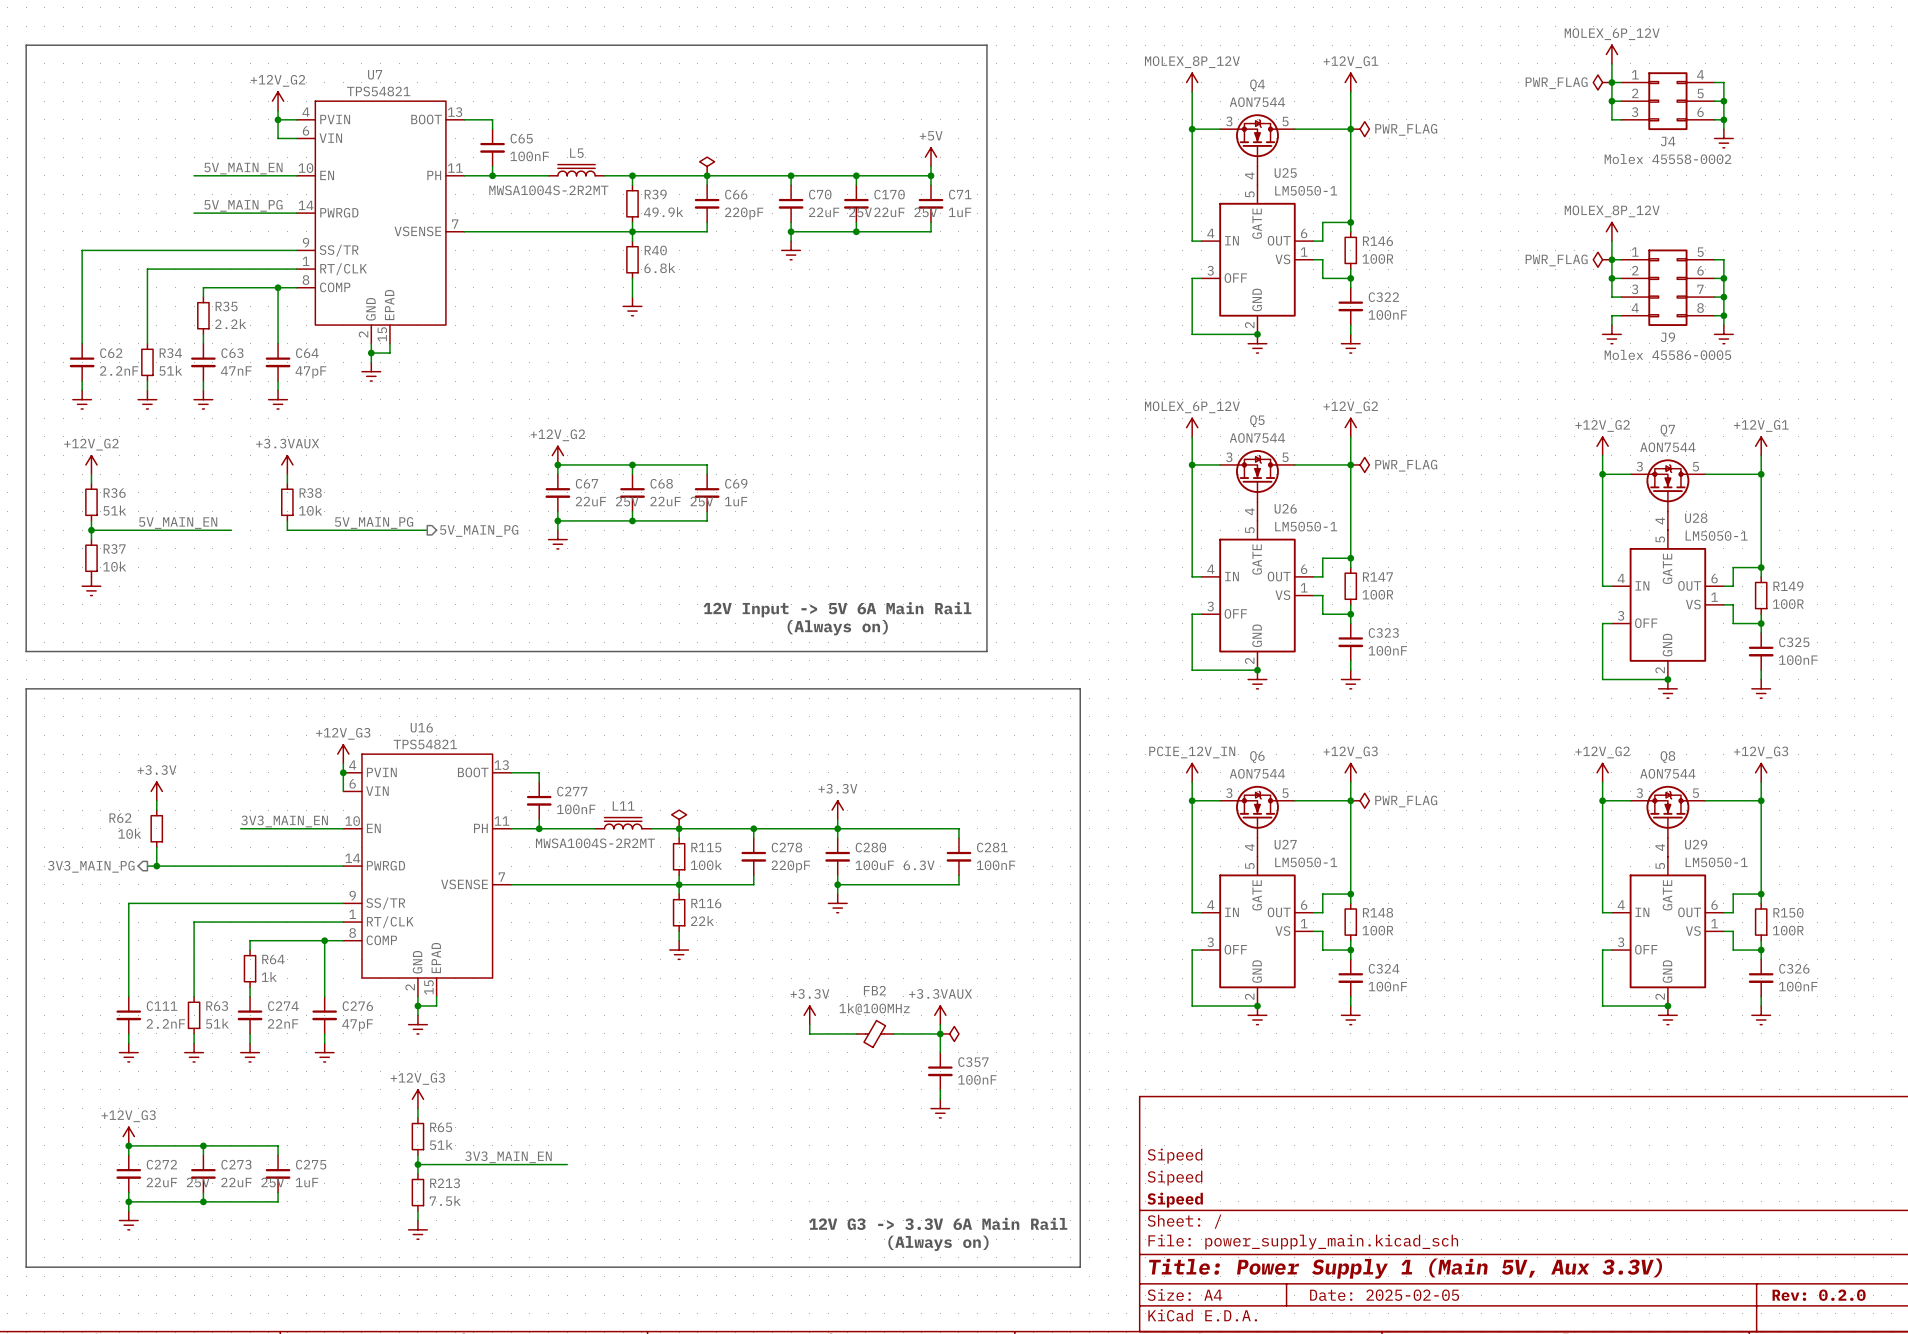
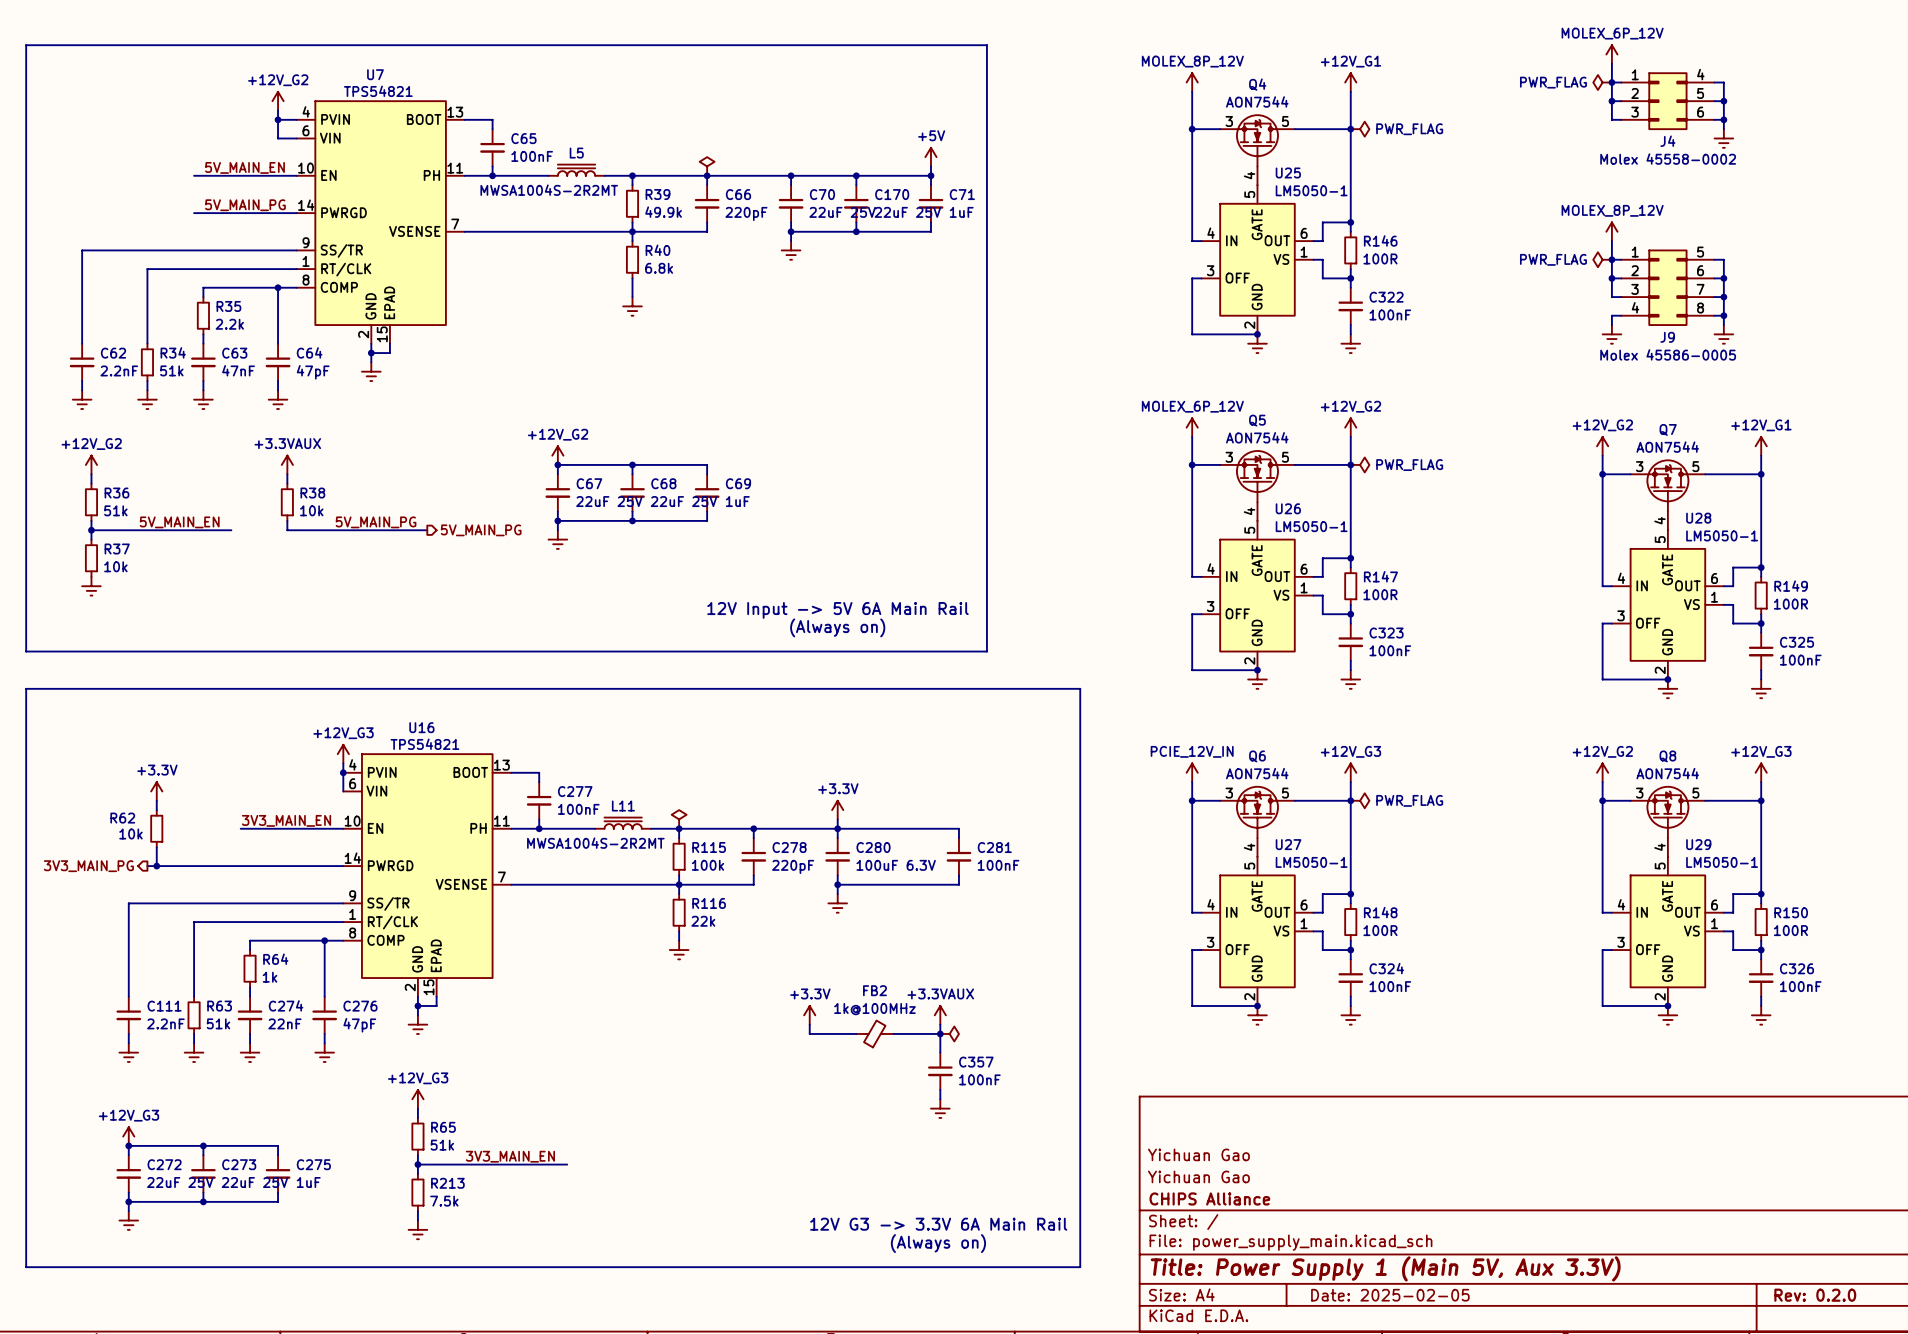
title block: Sipeed (1175, 1156) -> Yichuan Gao (1198, 1154)
title block: Sipeed (1175, 1178) -> Yichuan Gao (1198, 1176)
title block: Sipeed (1175, 1200) -> CHIPS Alliance (1209, 1198)

